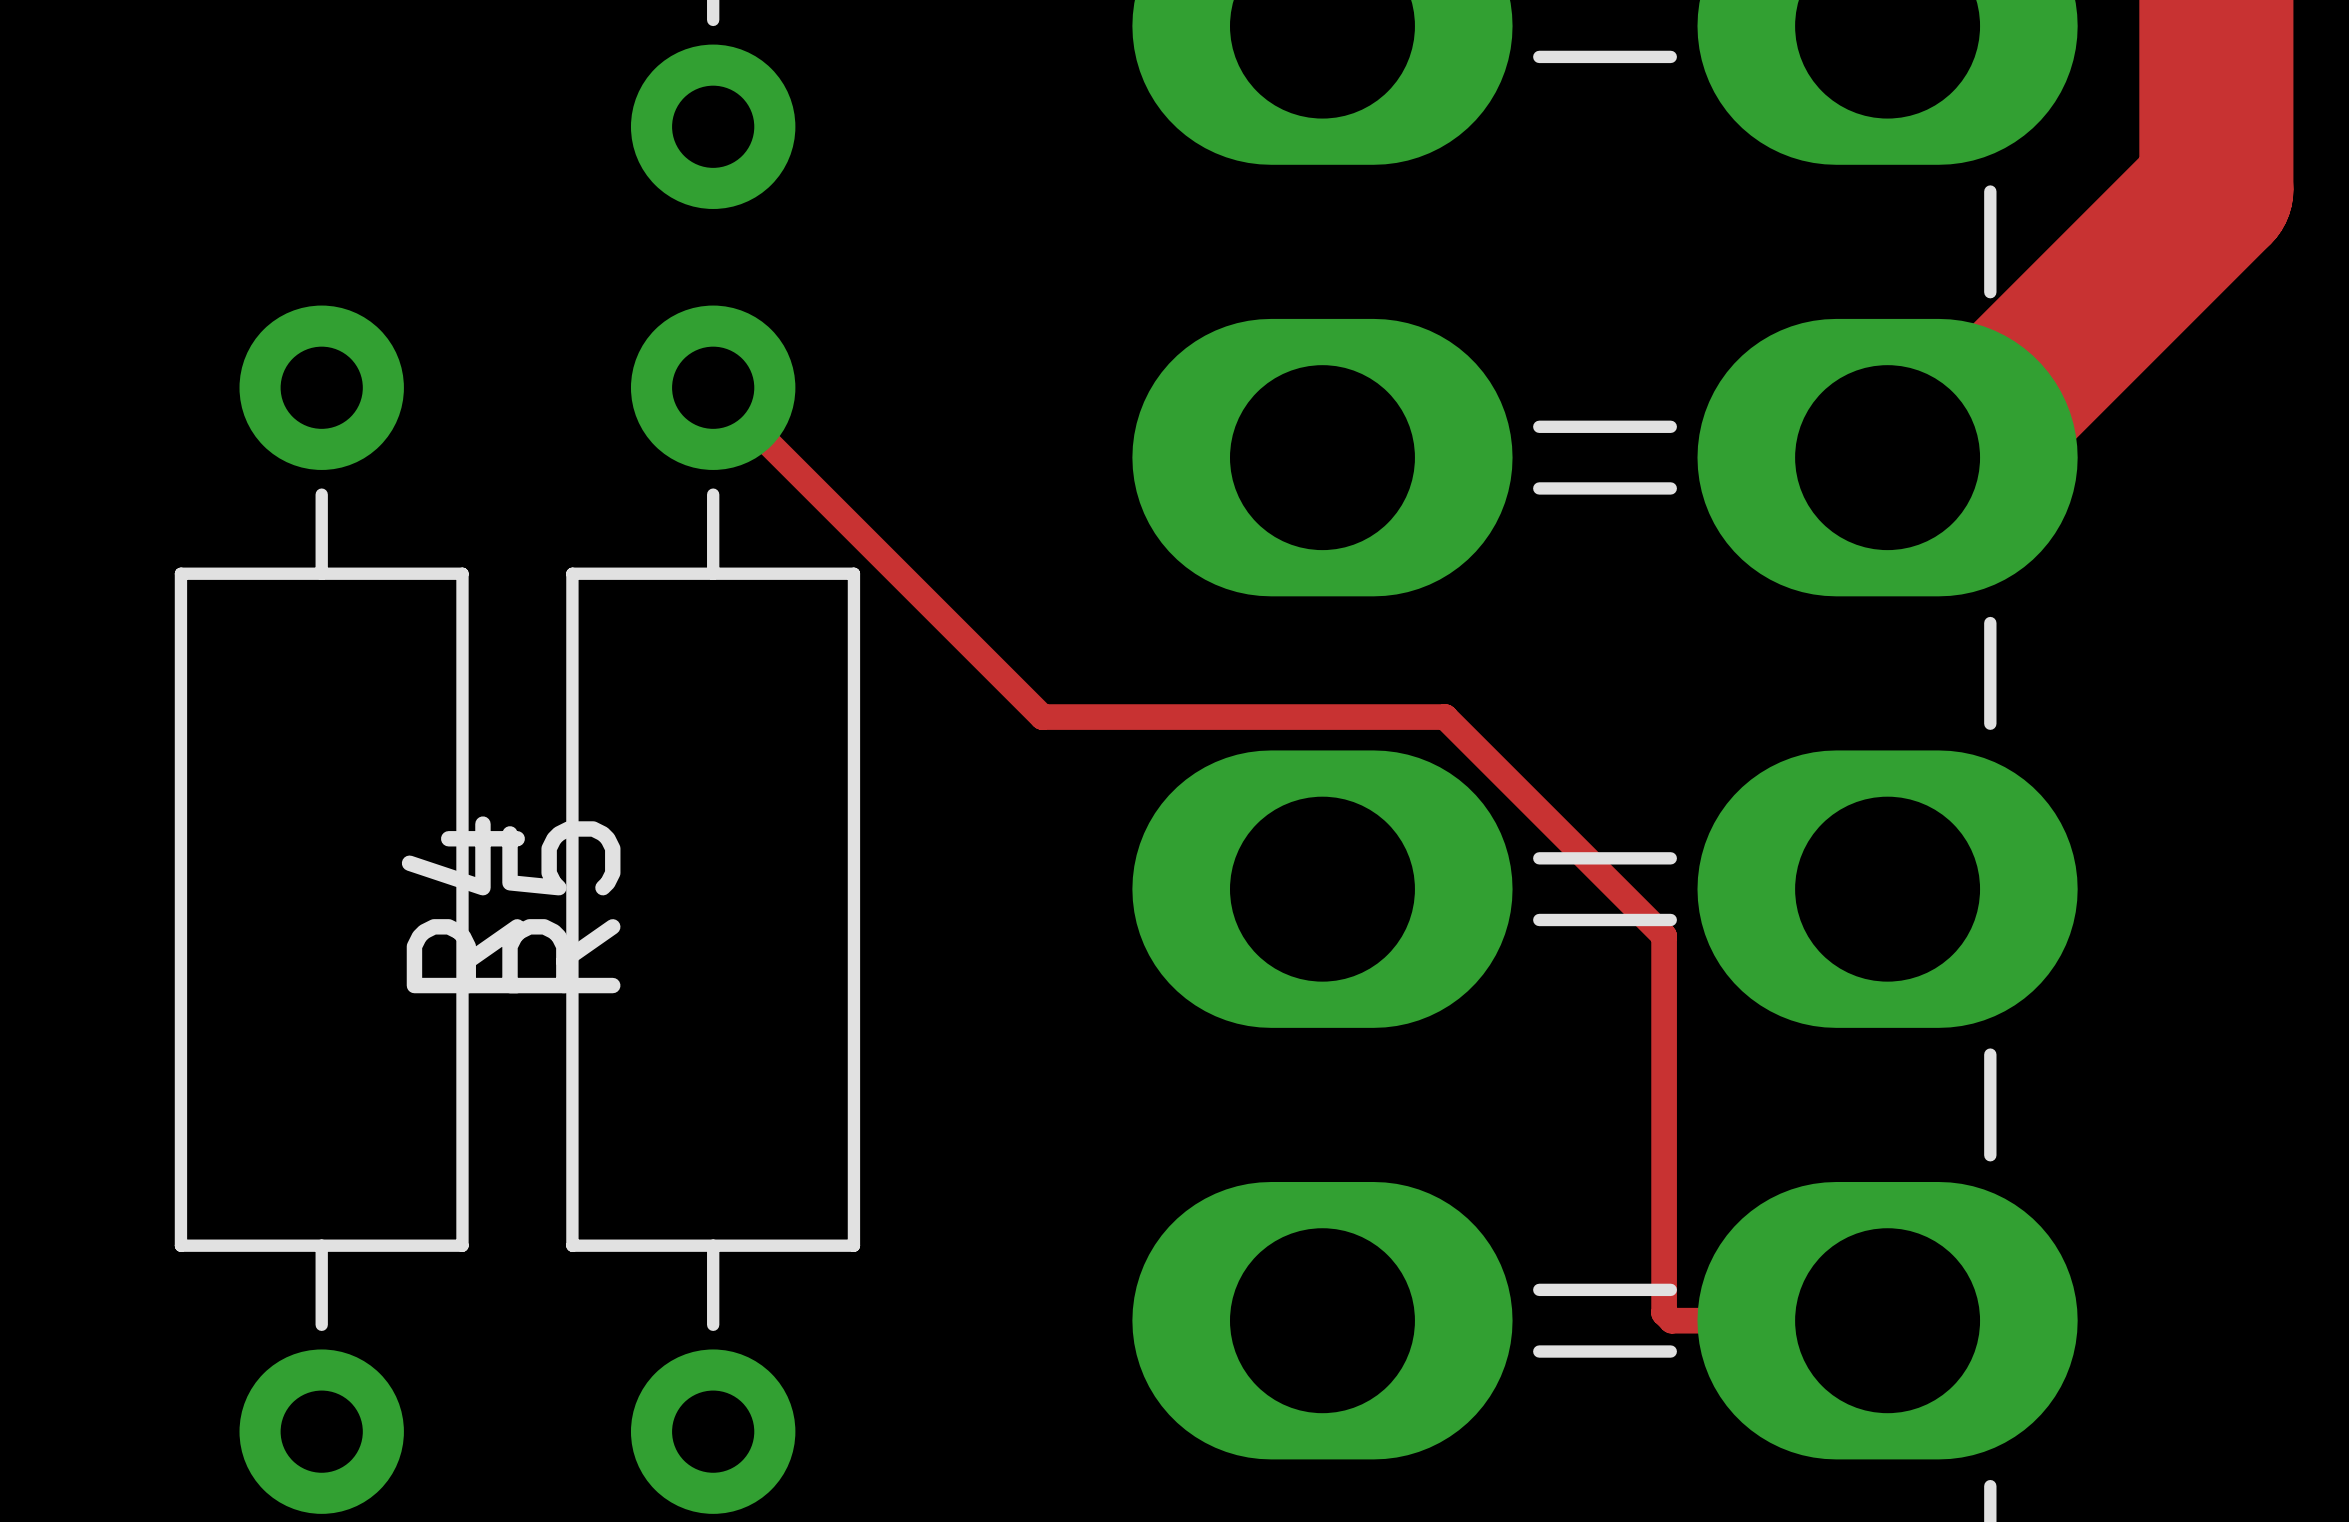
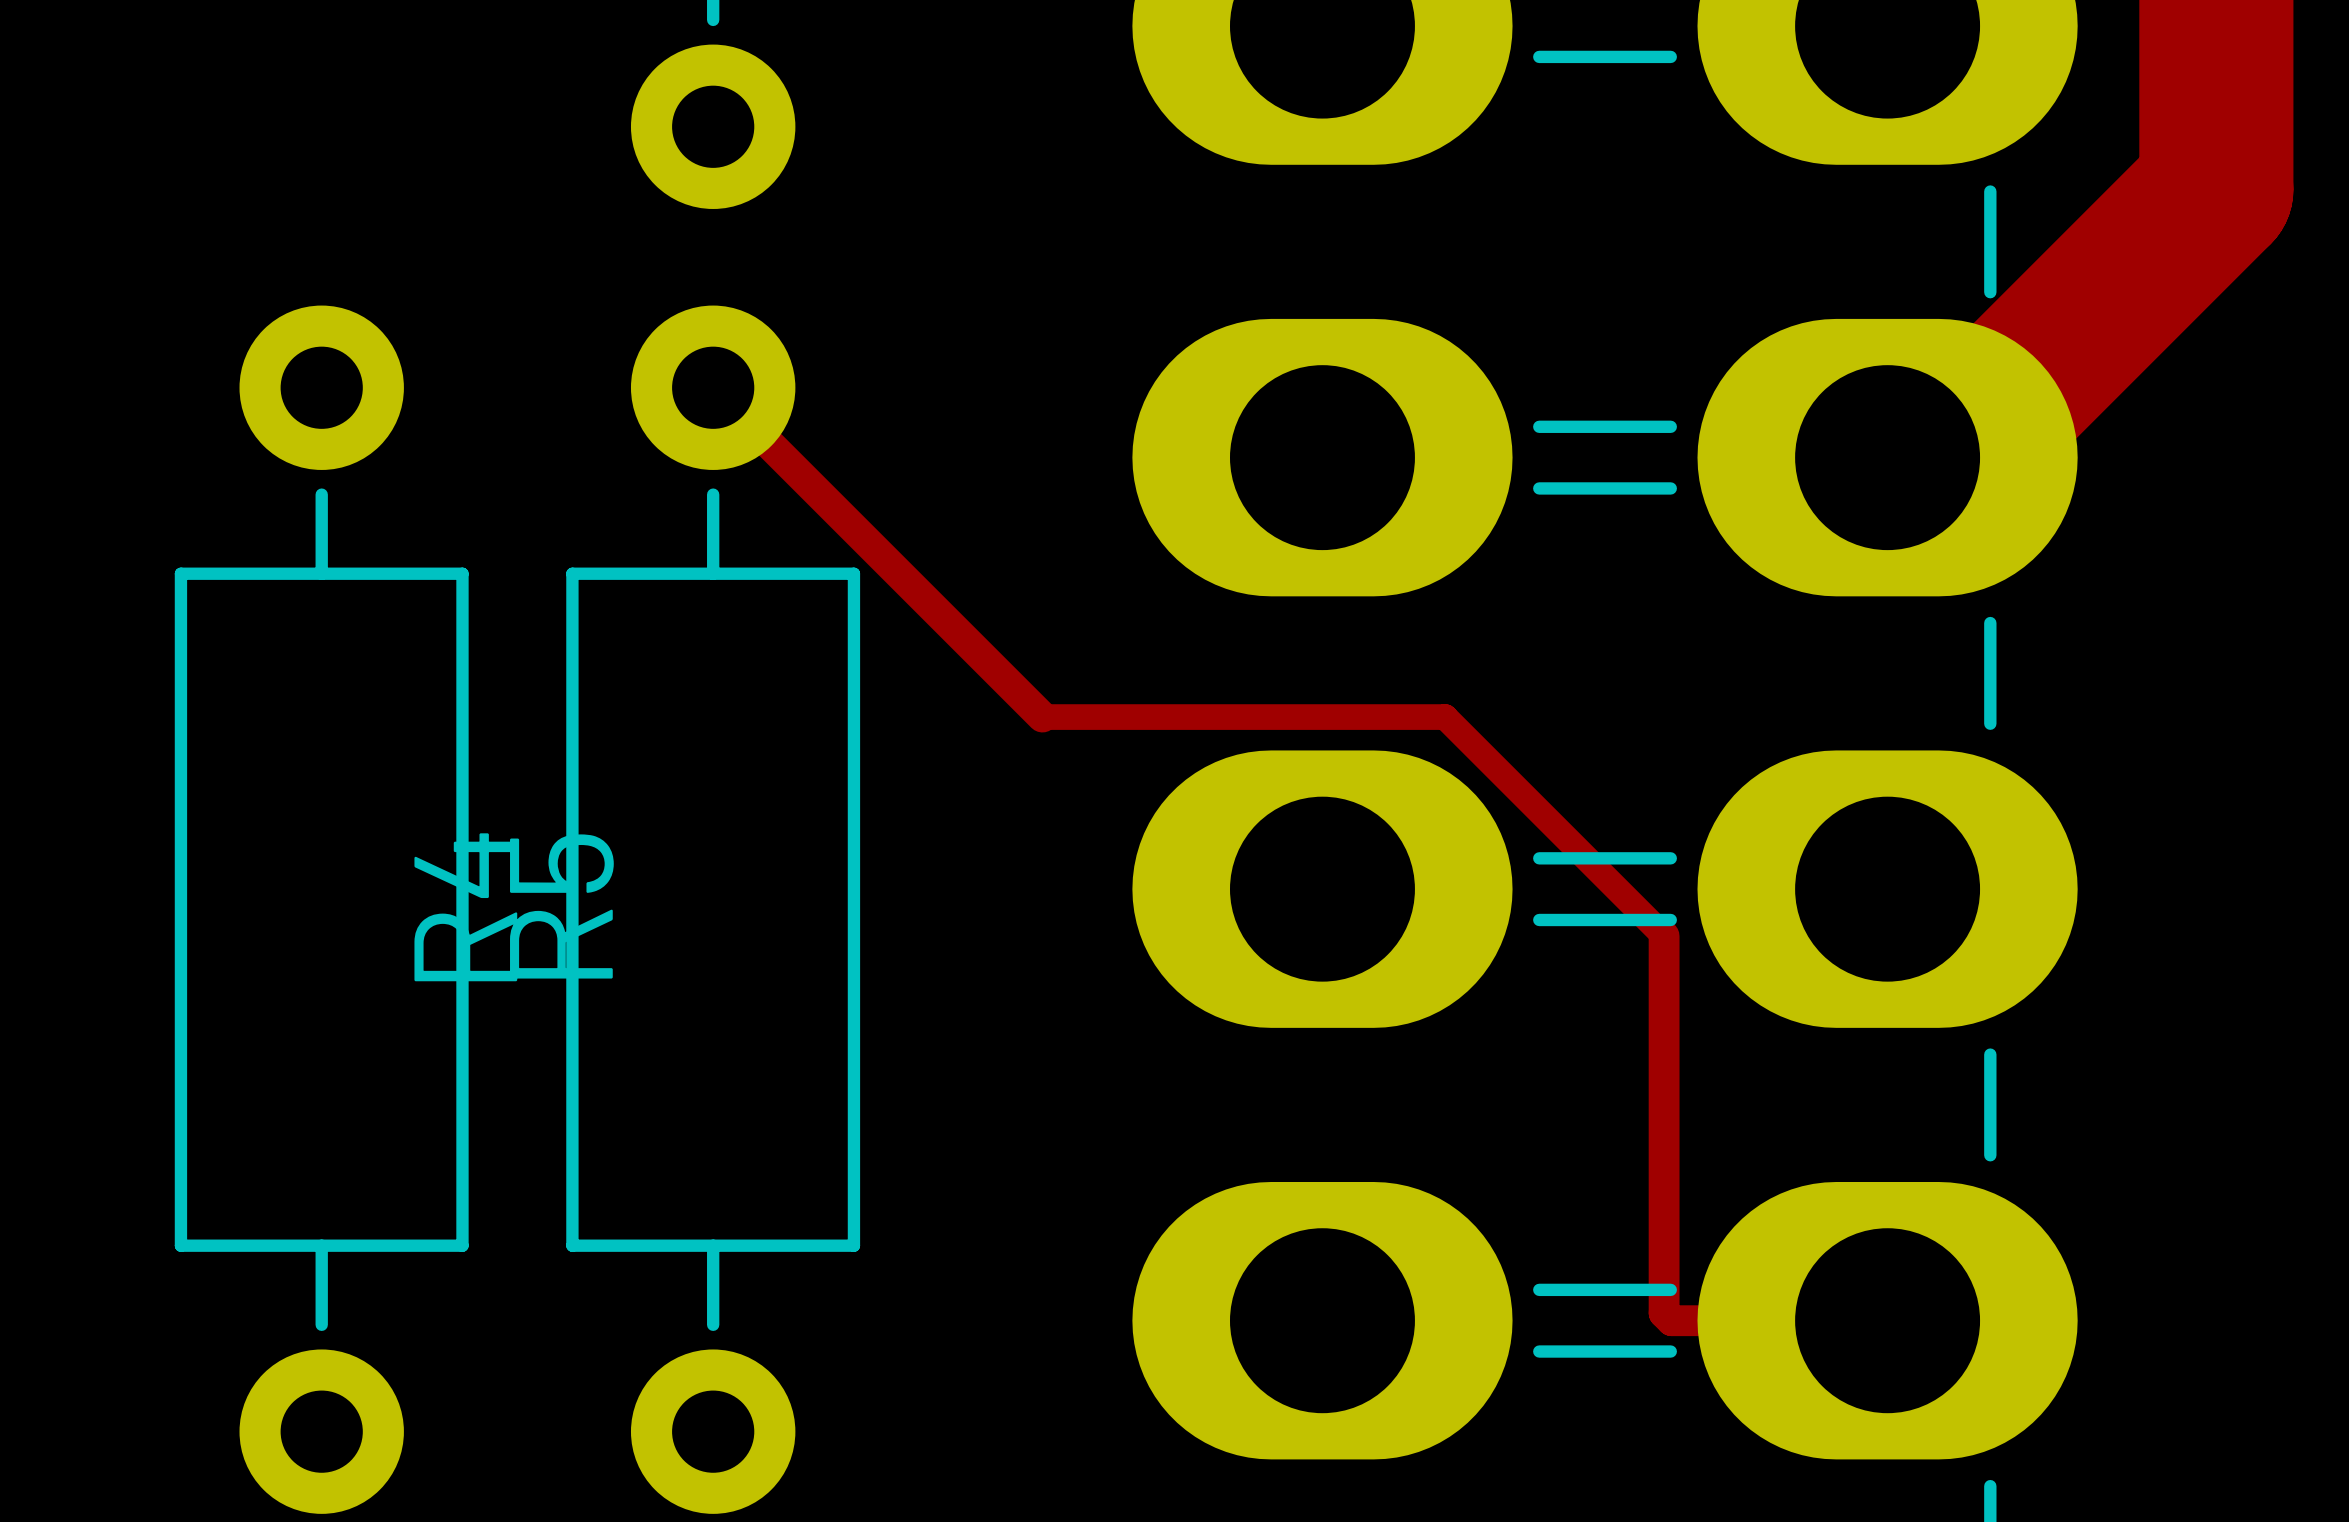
track width: thin (713, 387) (1042, 717) -> thick (713, 387) (1042, 717)
track width: thin (1664, 936) (1664, 1312) (1671, 1320) (1887, 1320) -> thick (1664, 936) (1664, 1312) (1671, 1320) (1887, 1320)

